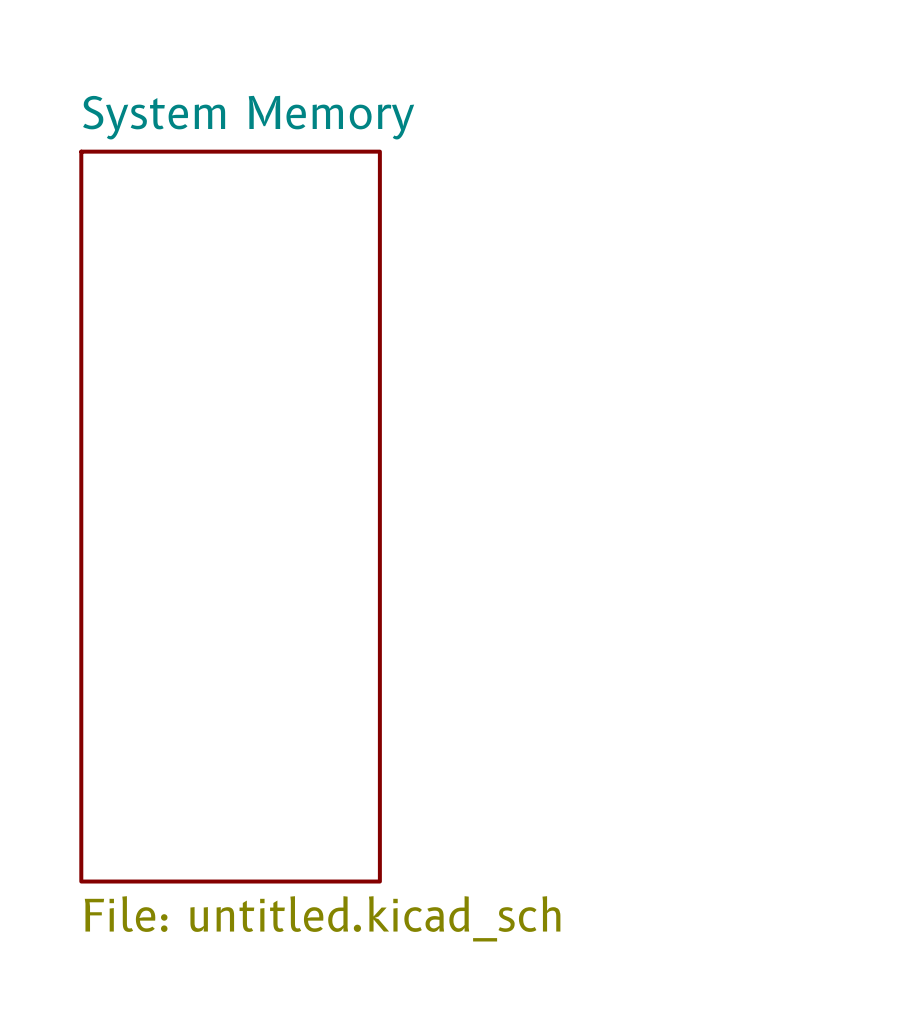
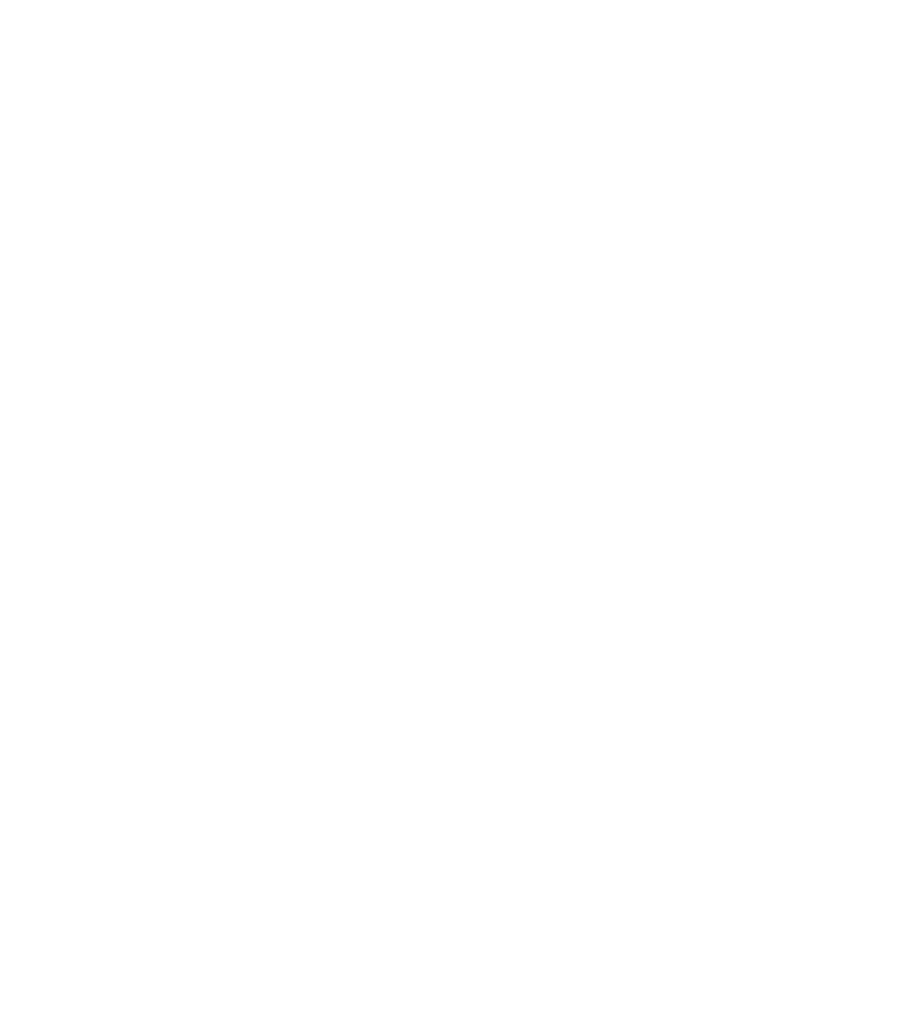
sheet System Memory: File: untitled.kicad_sch (230, 516) -> none

